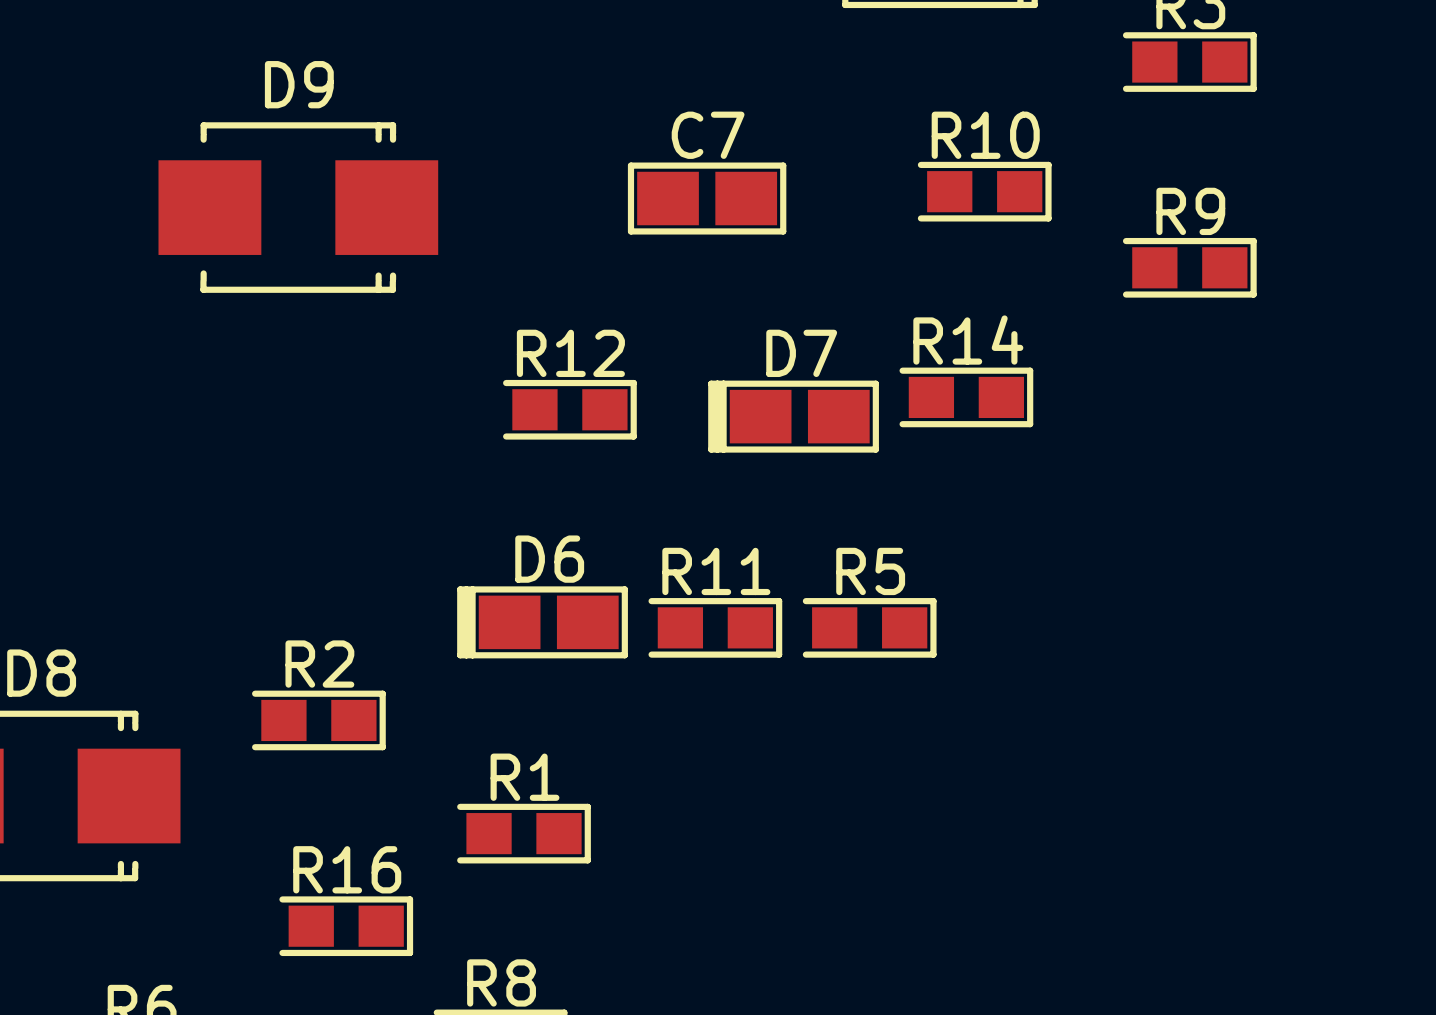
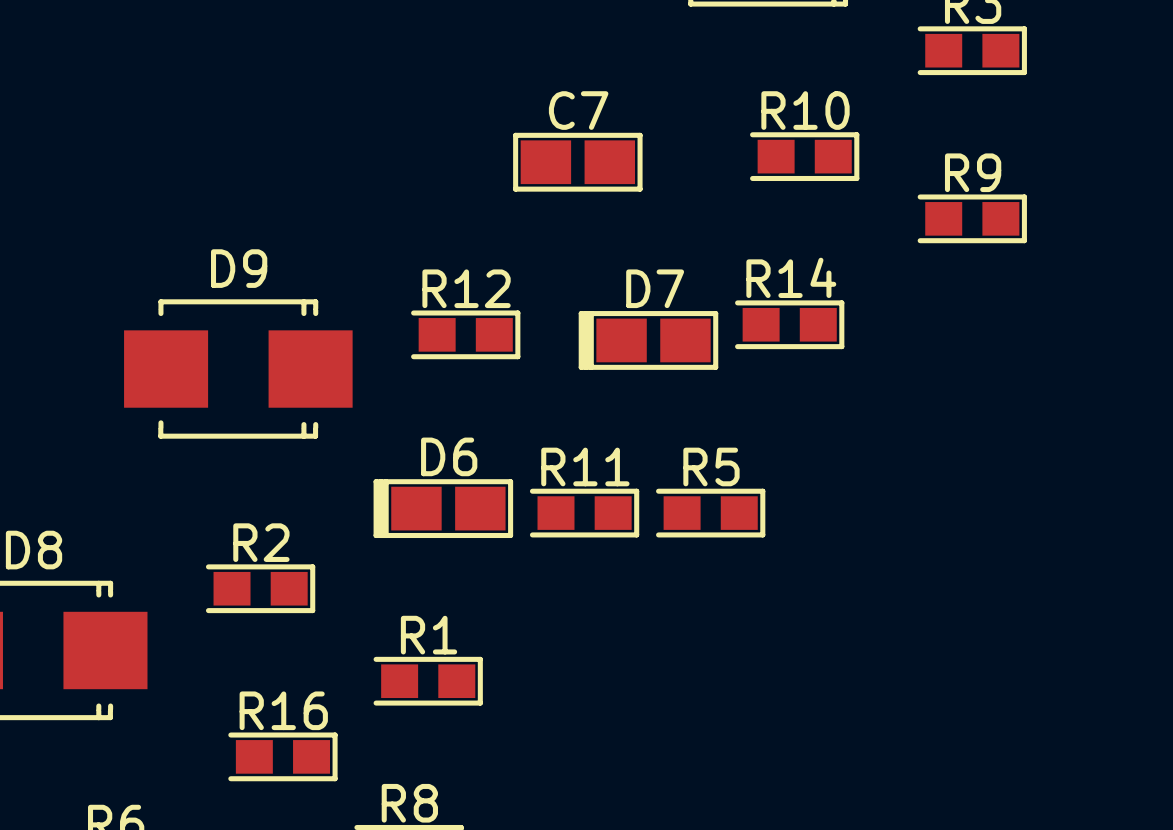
D9 position: (298, 207) -> (238, 369)

